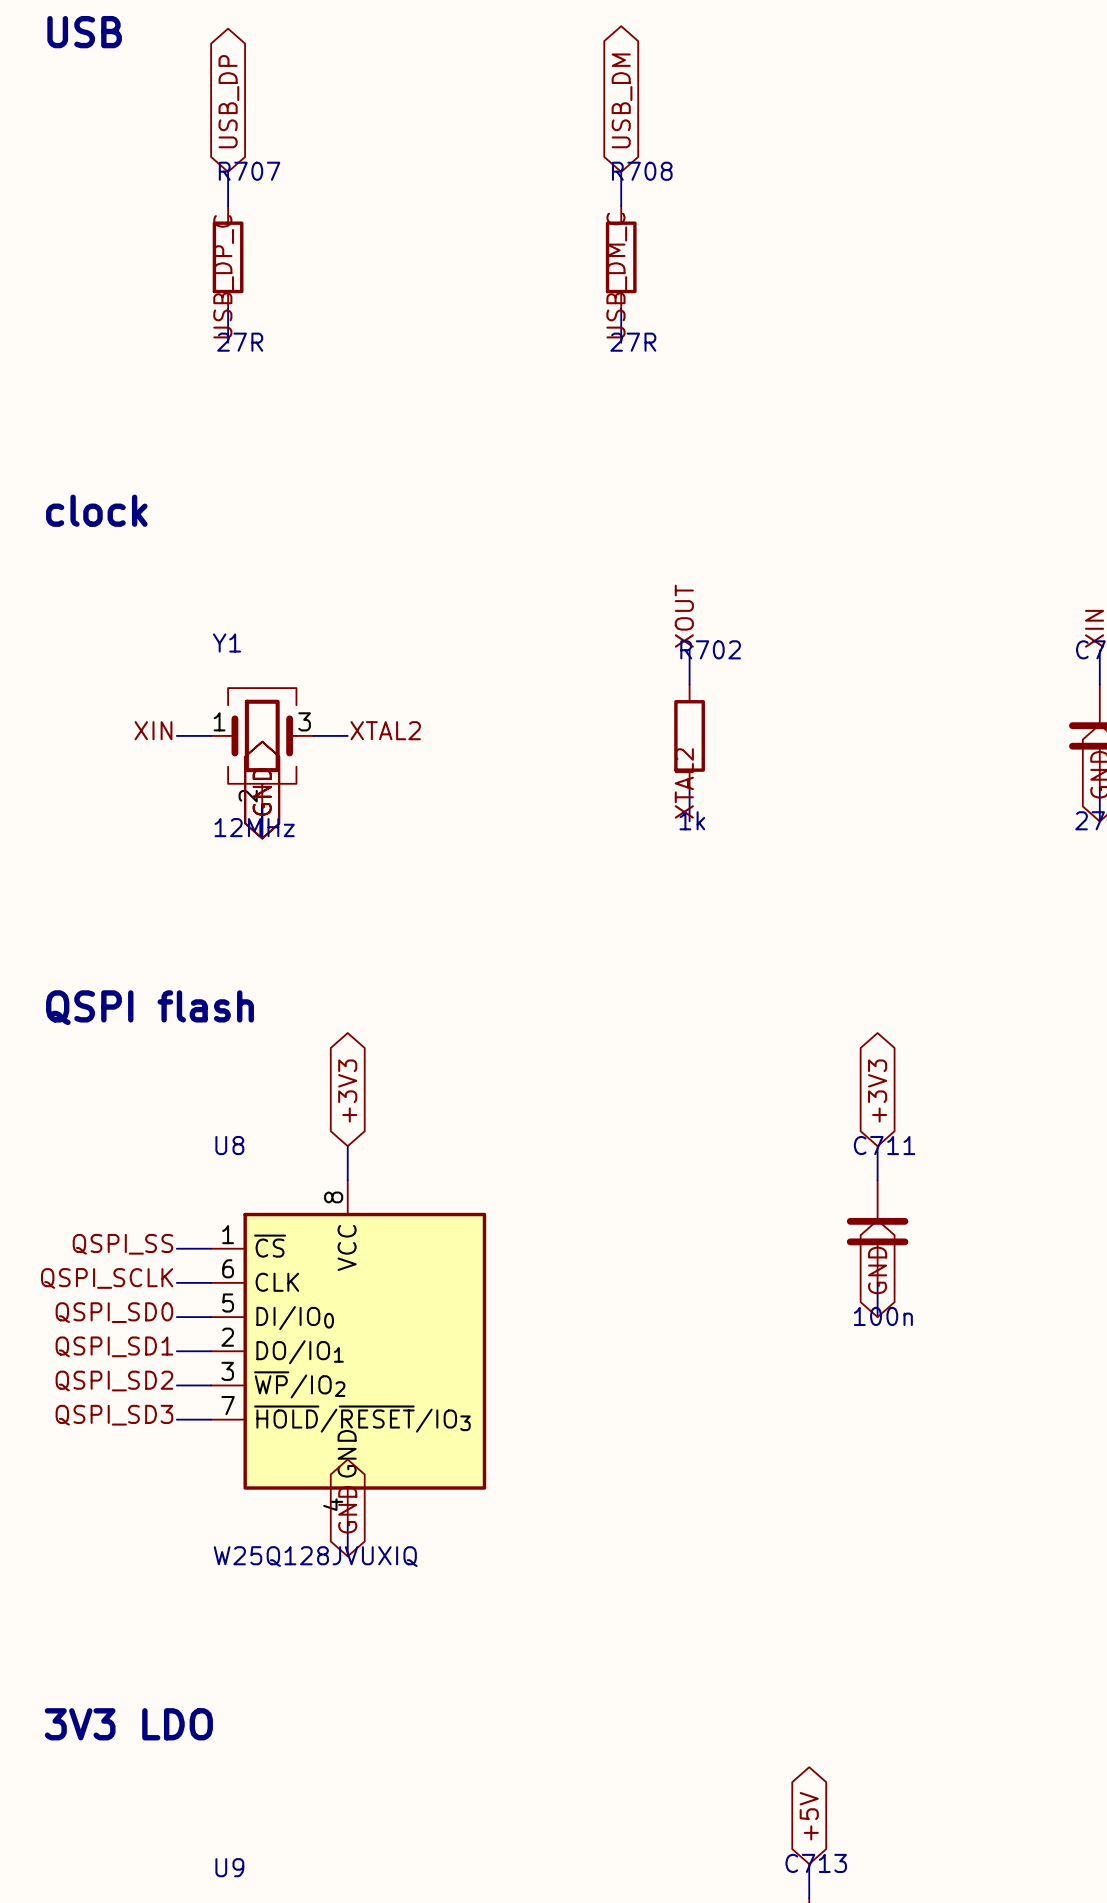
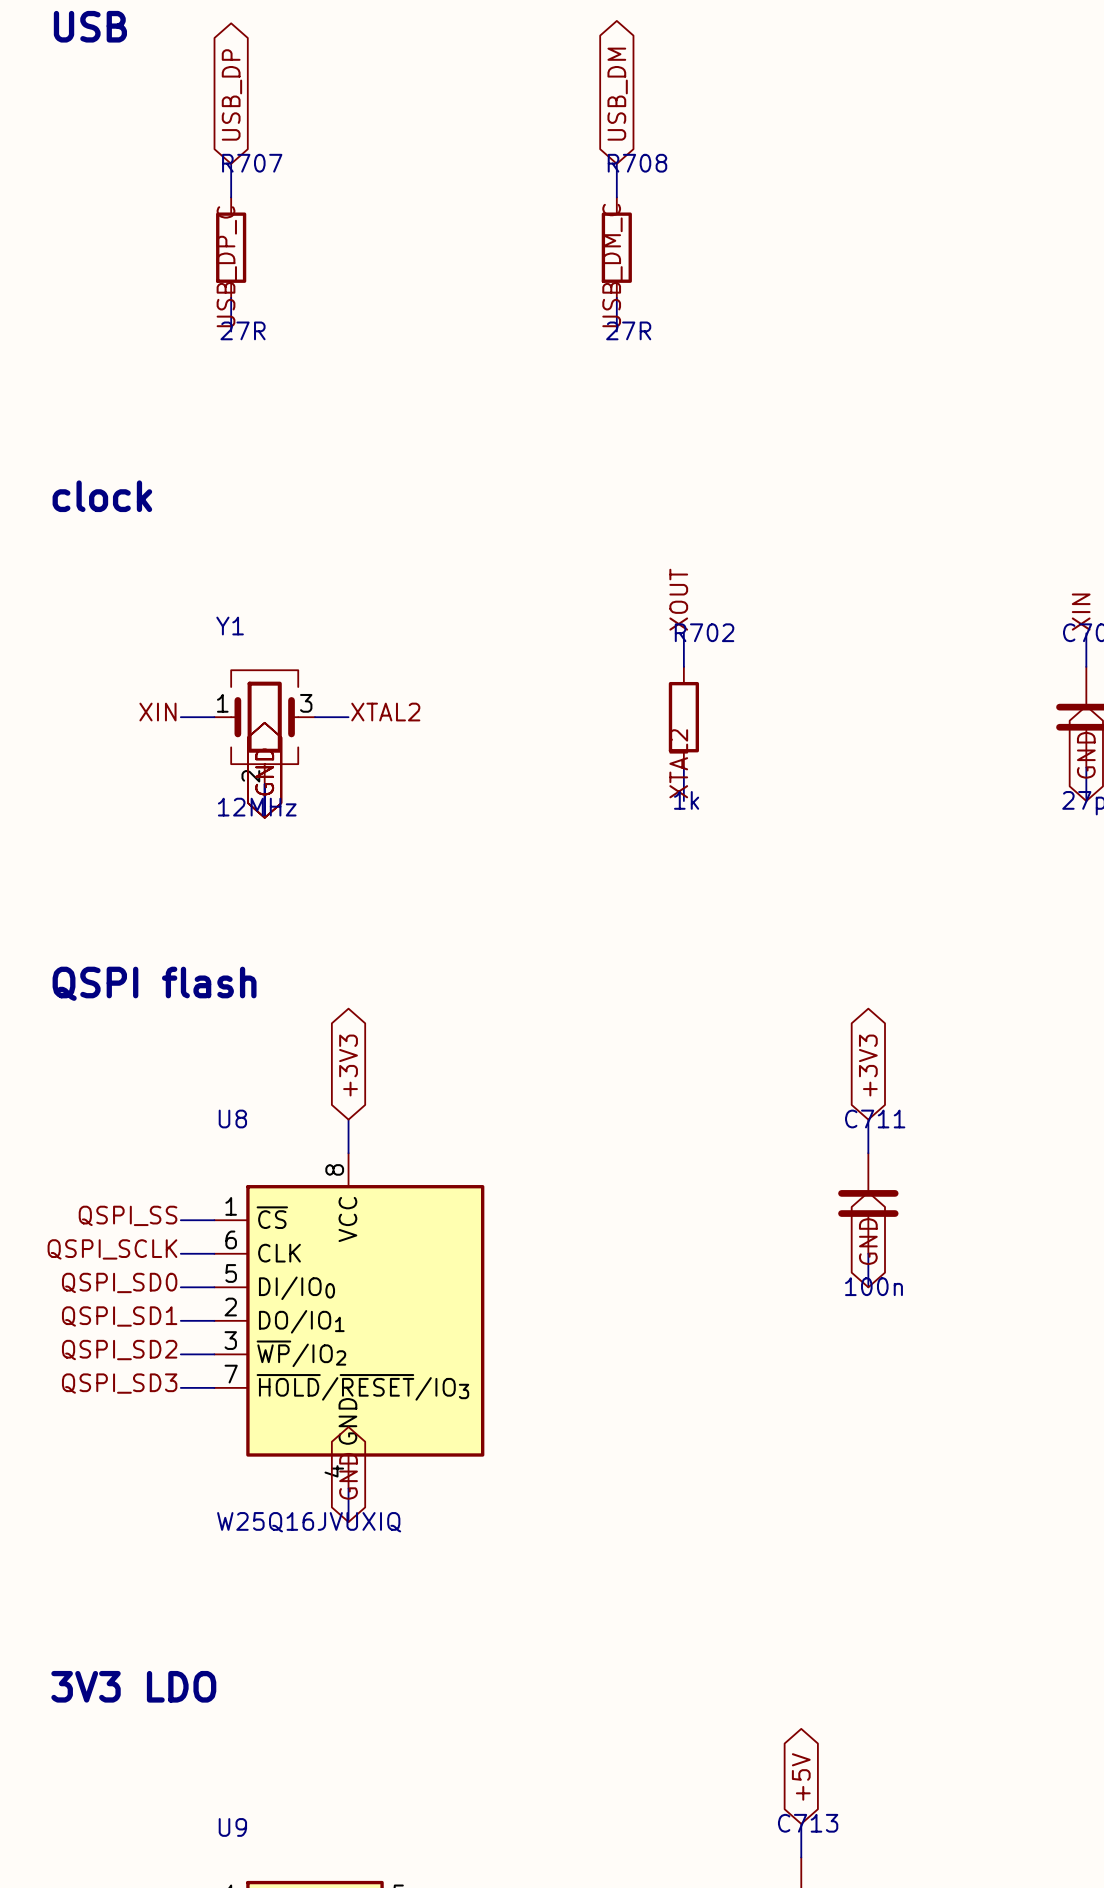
U8 value: W25Q128JVUXIQ (315, 1556) -> W25Q16JVUXIQ (309, 1522)

